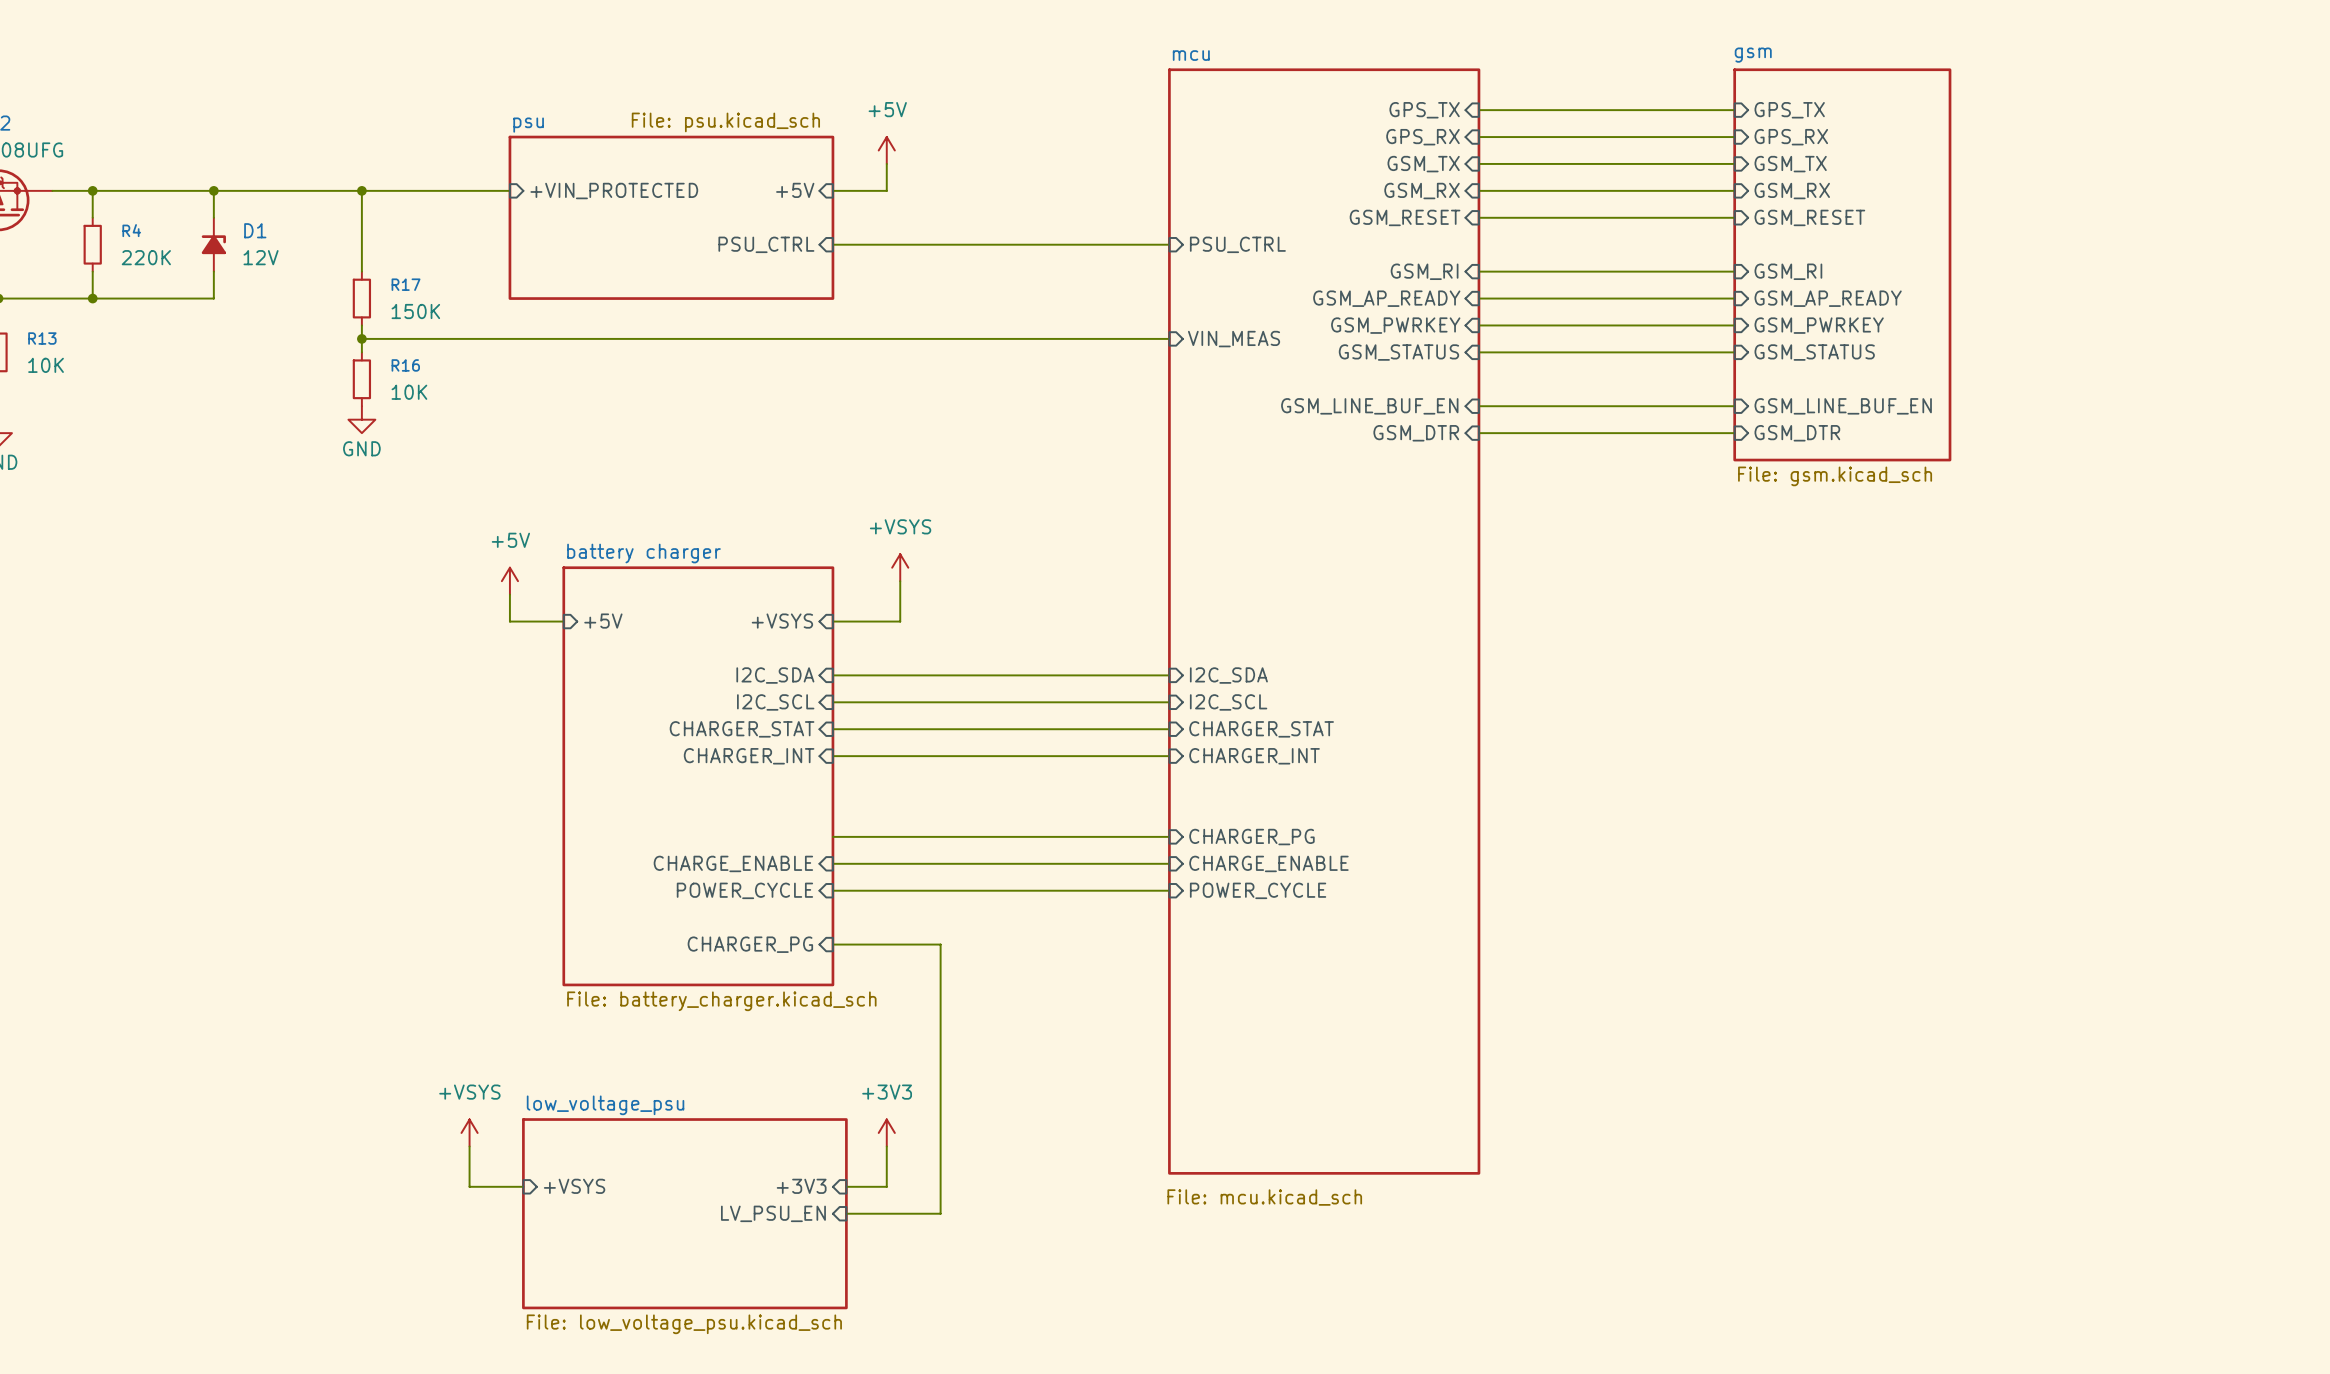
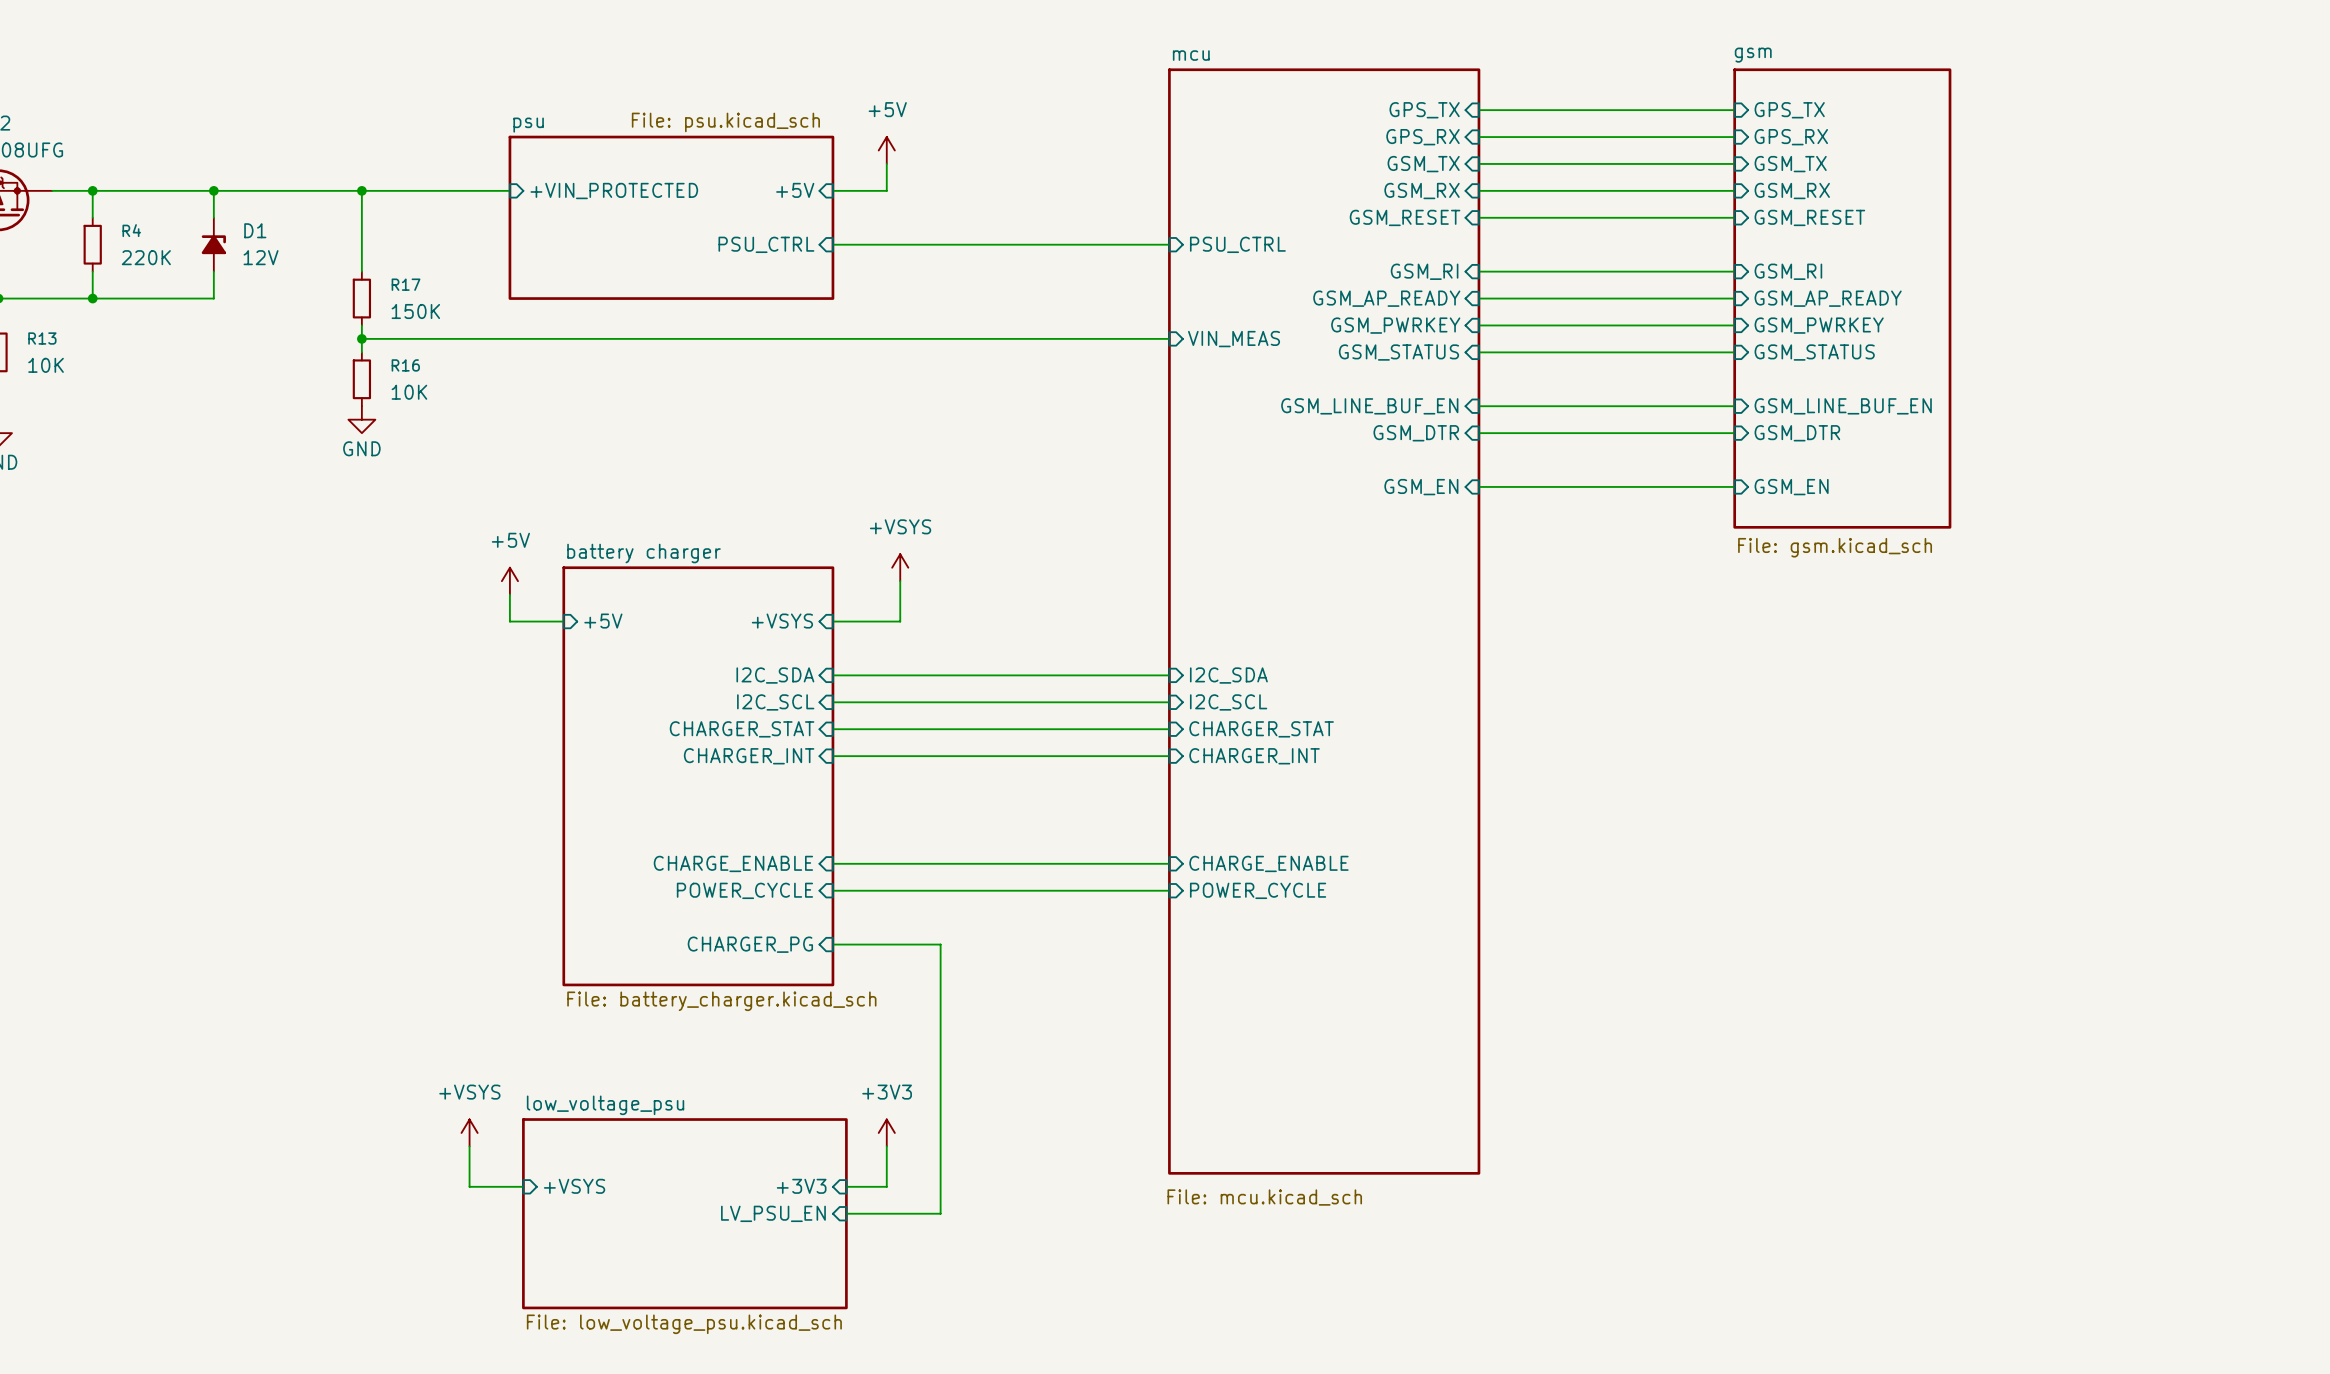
sheet gsm: File: gsm.kicad_sch (1842, 264) -> none
sheet gsm: none -> File: gsm.kicad_sch (1842, 298)
wire: none -> (1478, 486) (1734, 486)
sheet pin: none -> GSM_EN (1421, 487)
sheet pin: none -> GSM_EN (1791, 487)
wire: (832, 836) (1169, 836) -> none
sheet pin: CHARGER_PG (1251, 837) -> none

